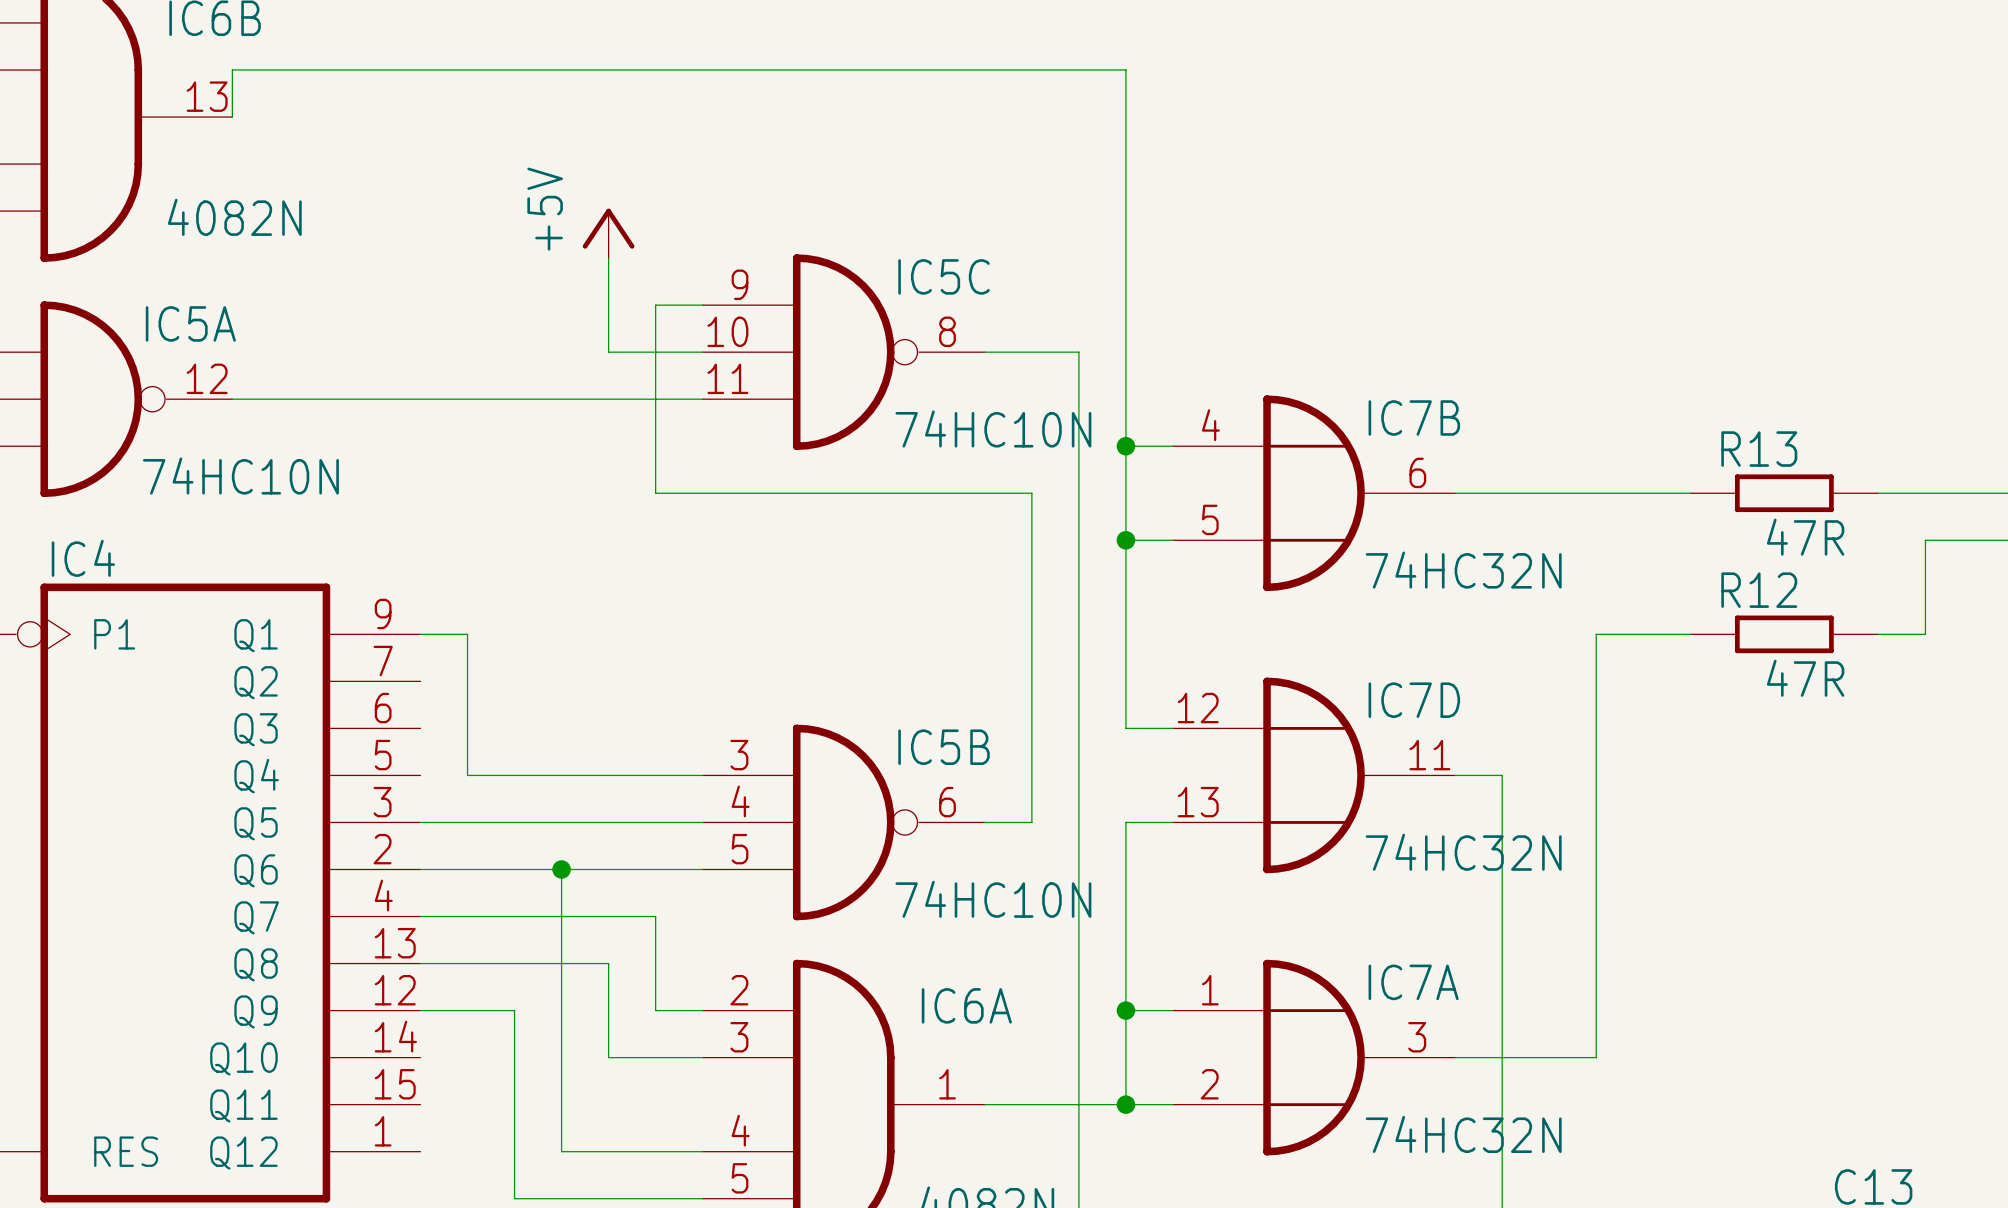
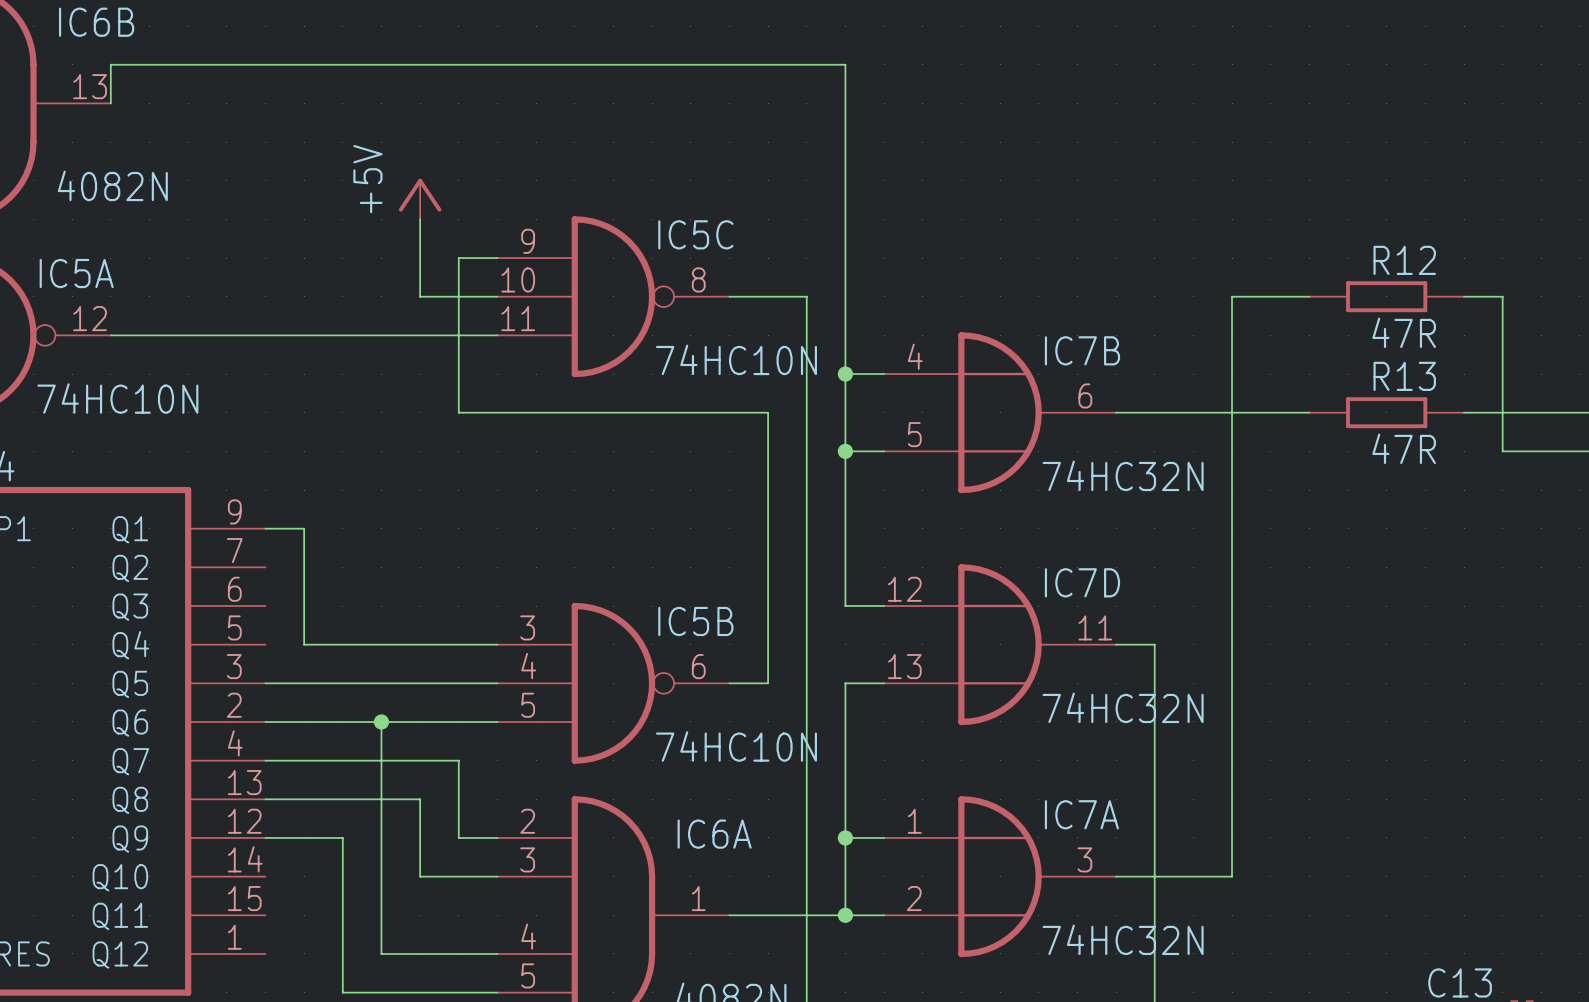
R13 name position: R13 (1759, 449) -> R13 (1404, 376)
wire: (1925, 540) (1925, 634) (1878, 634) -> (1502, 451) (1502, 296) (1464, 296)
R12 name position: R12 (1759, 590) -> R12 (1404, 260)
wire: (1596, 634) (1690, 634) -> (1232, 528) (1232, 296) (1309, 296)
R12 position: (1784, 634) -> (1386, 296)

